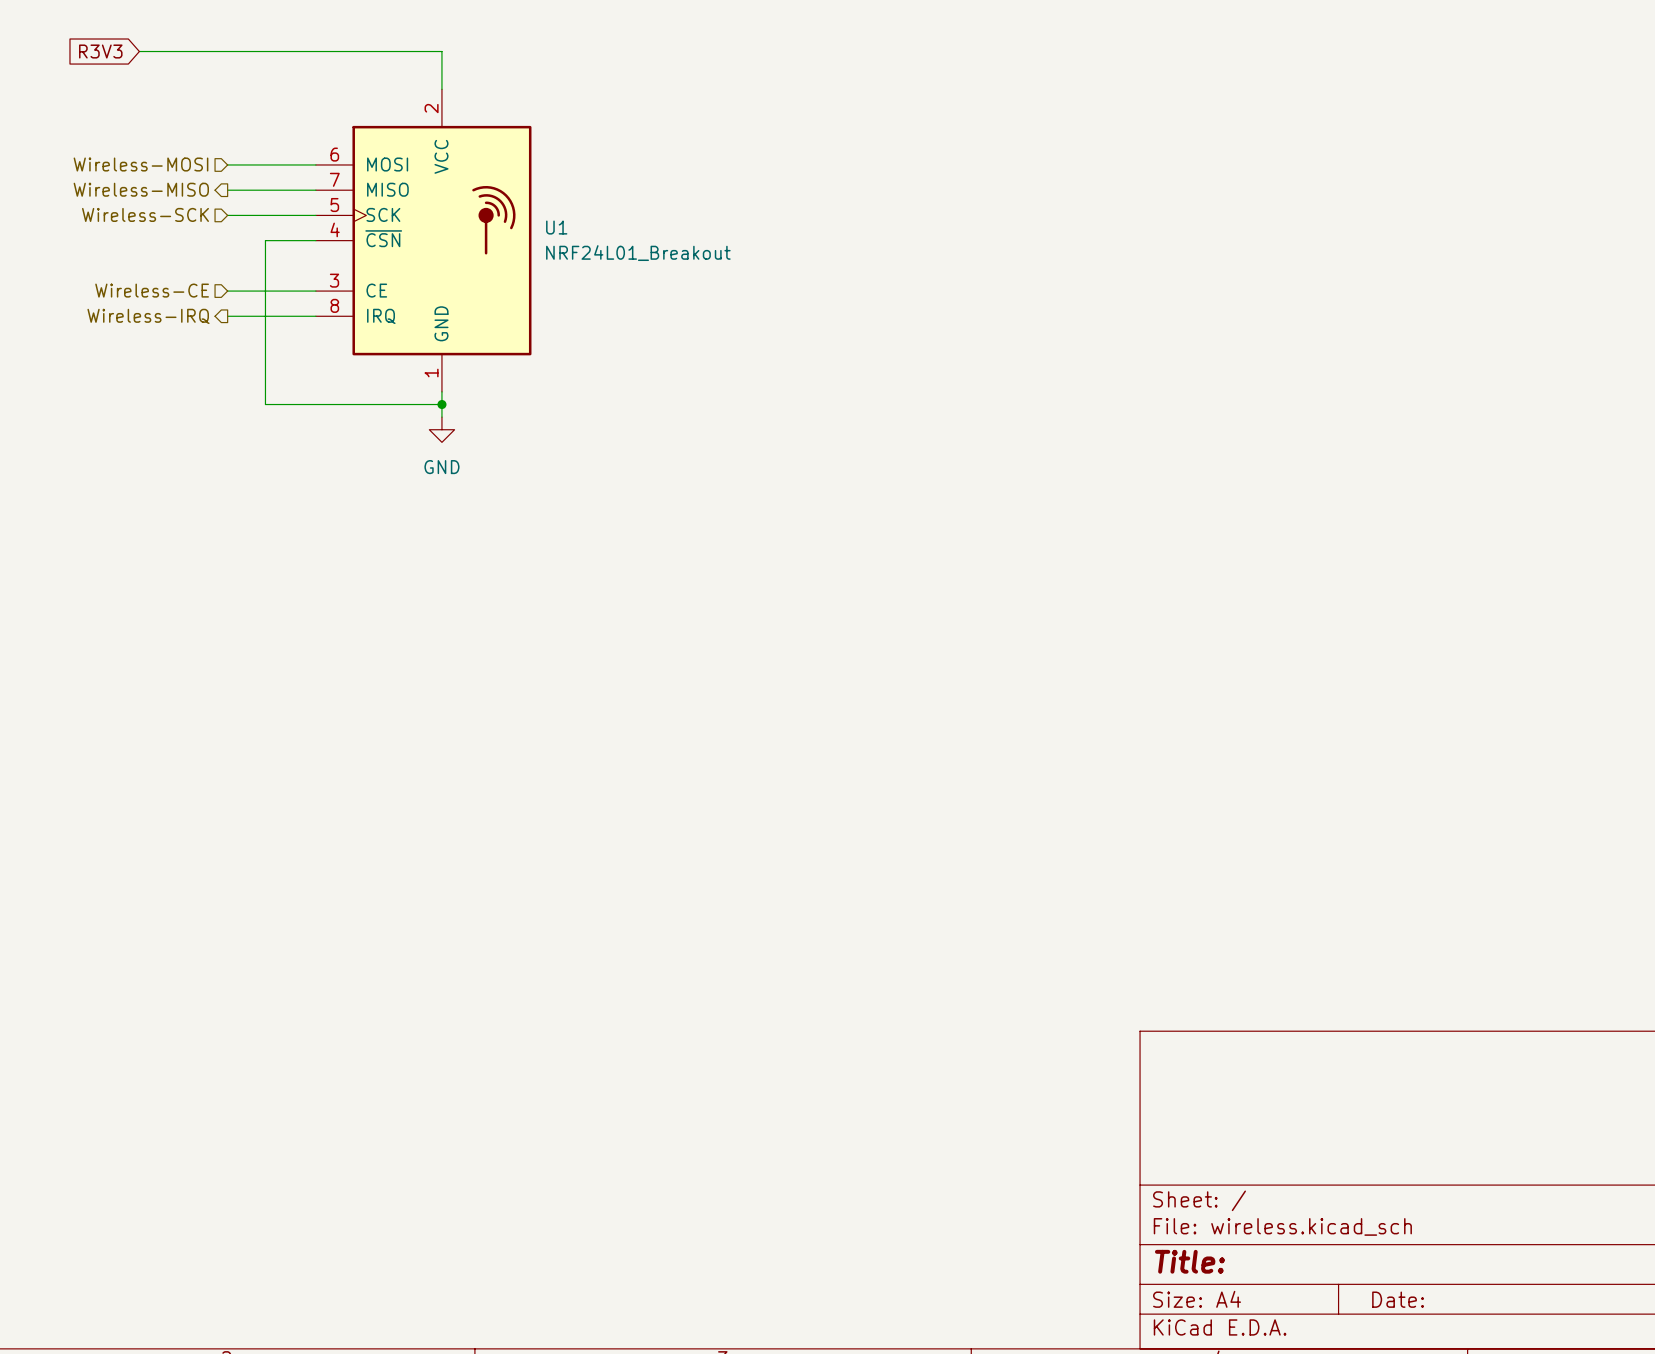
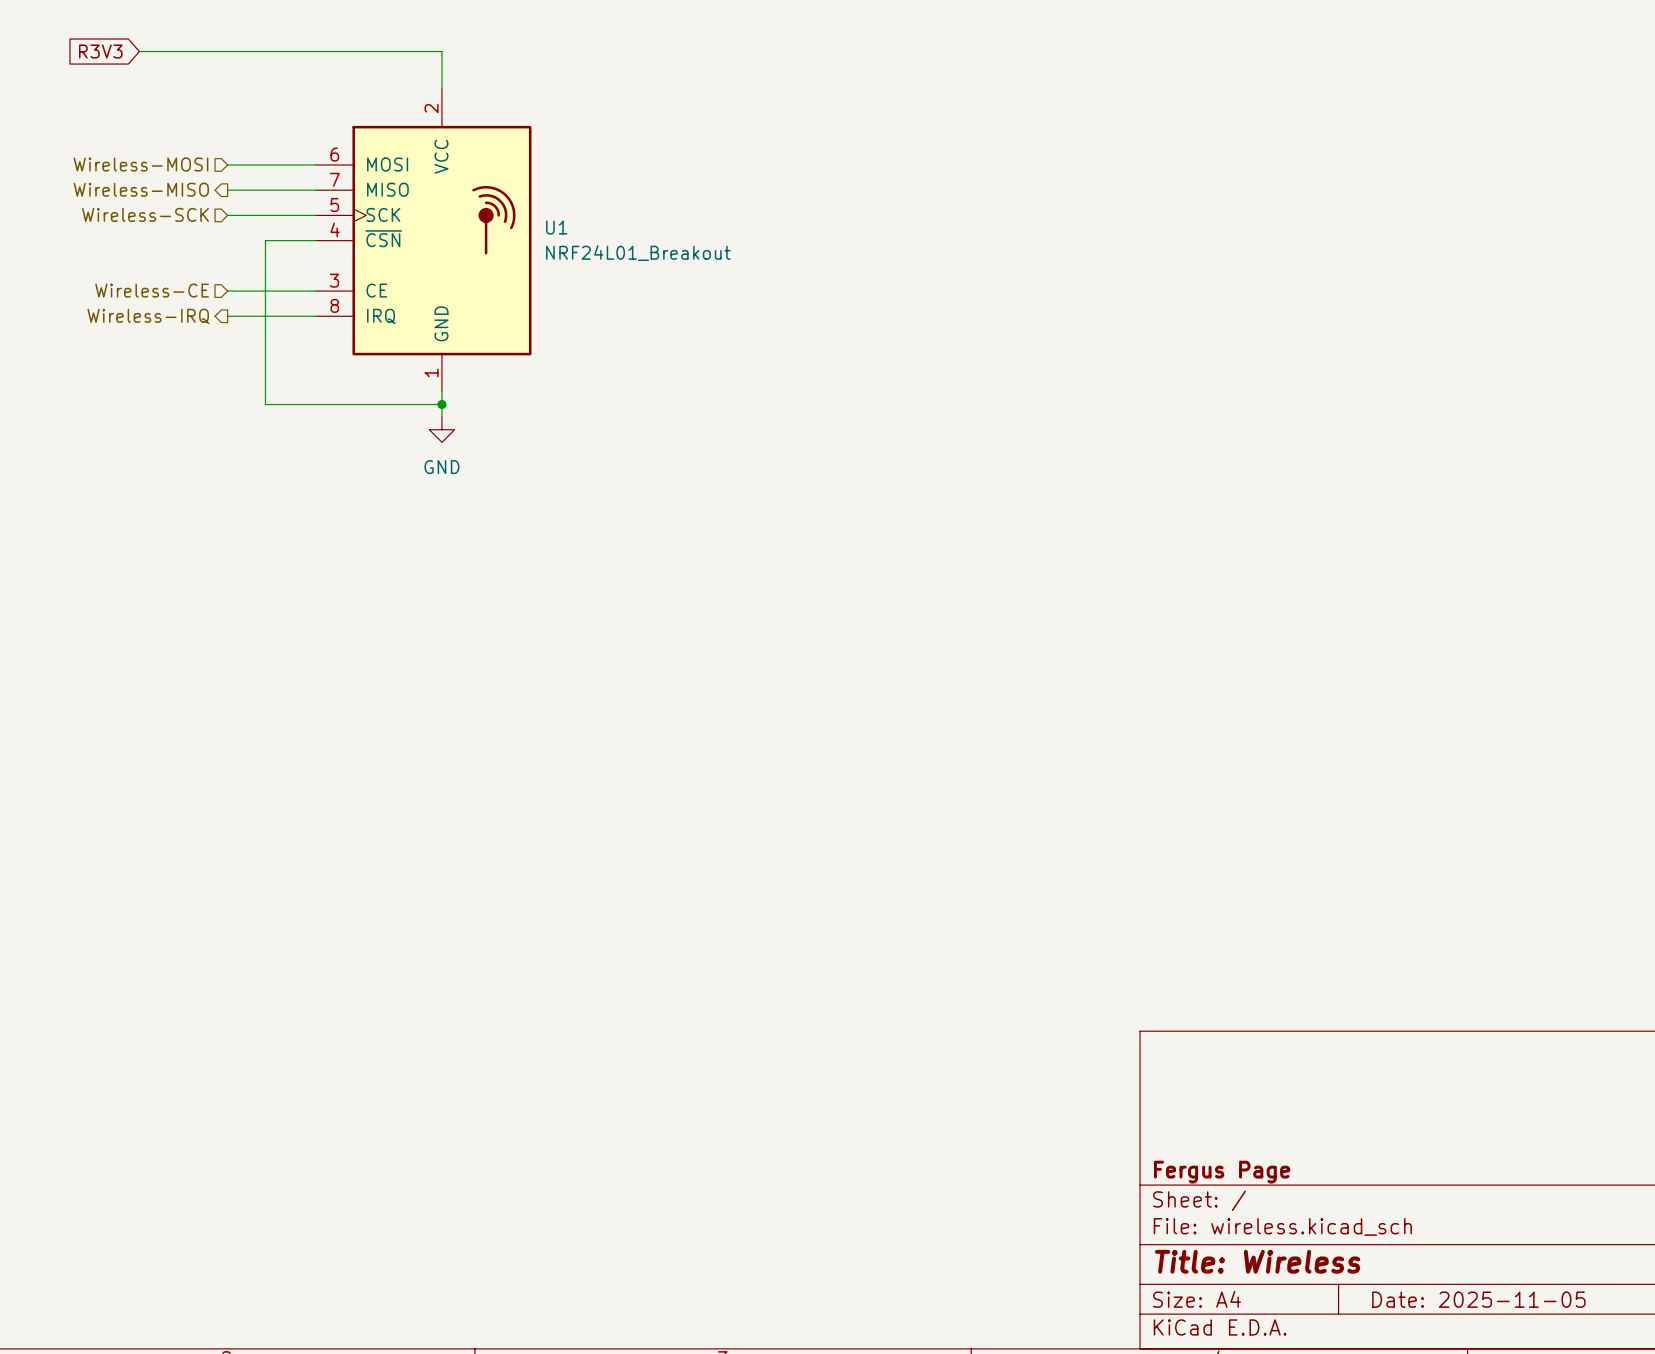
title block: none -> Fergus Page (1222, 1172)
title block: Title: (1189, 1261) -> Title: Wireless (1257, 1261)
title block: Date: (1398, 1299) -> Date: 2025-11-05 (1478, 1299)

